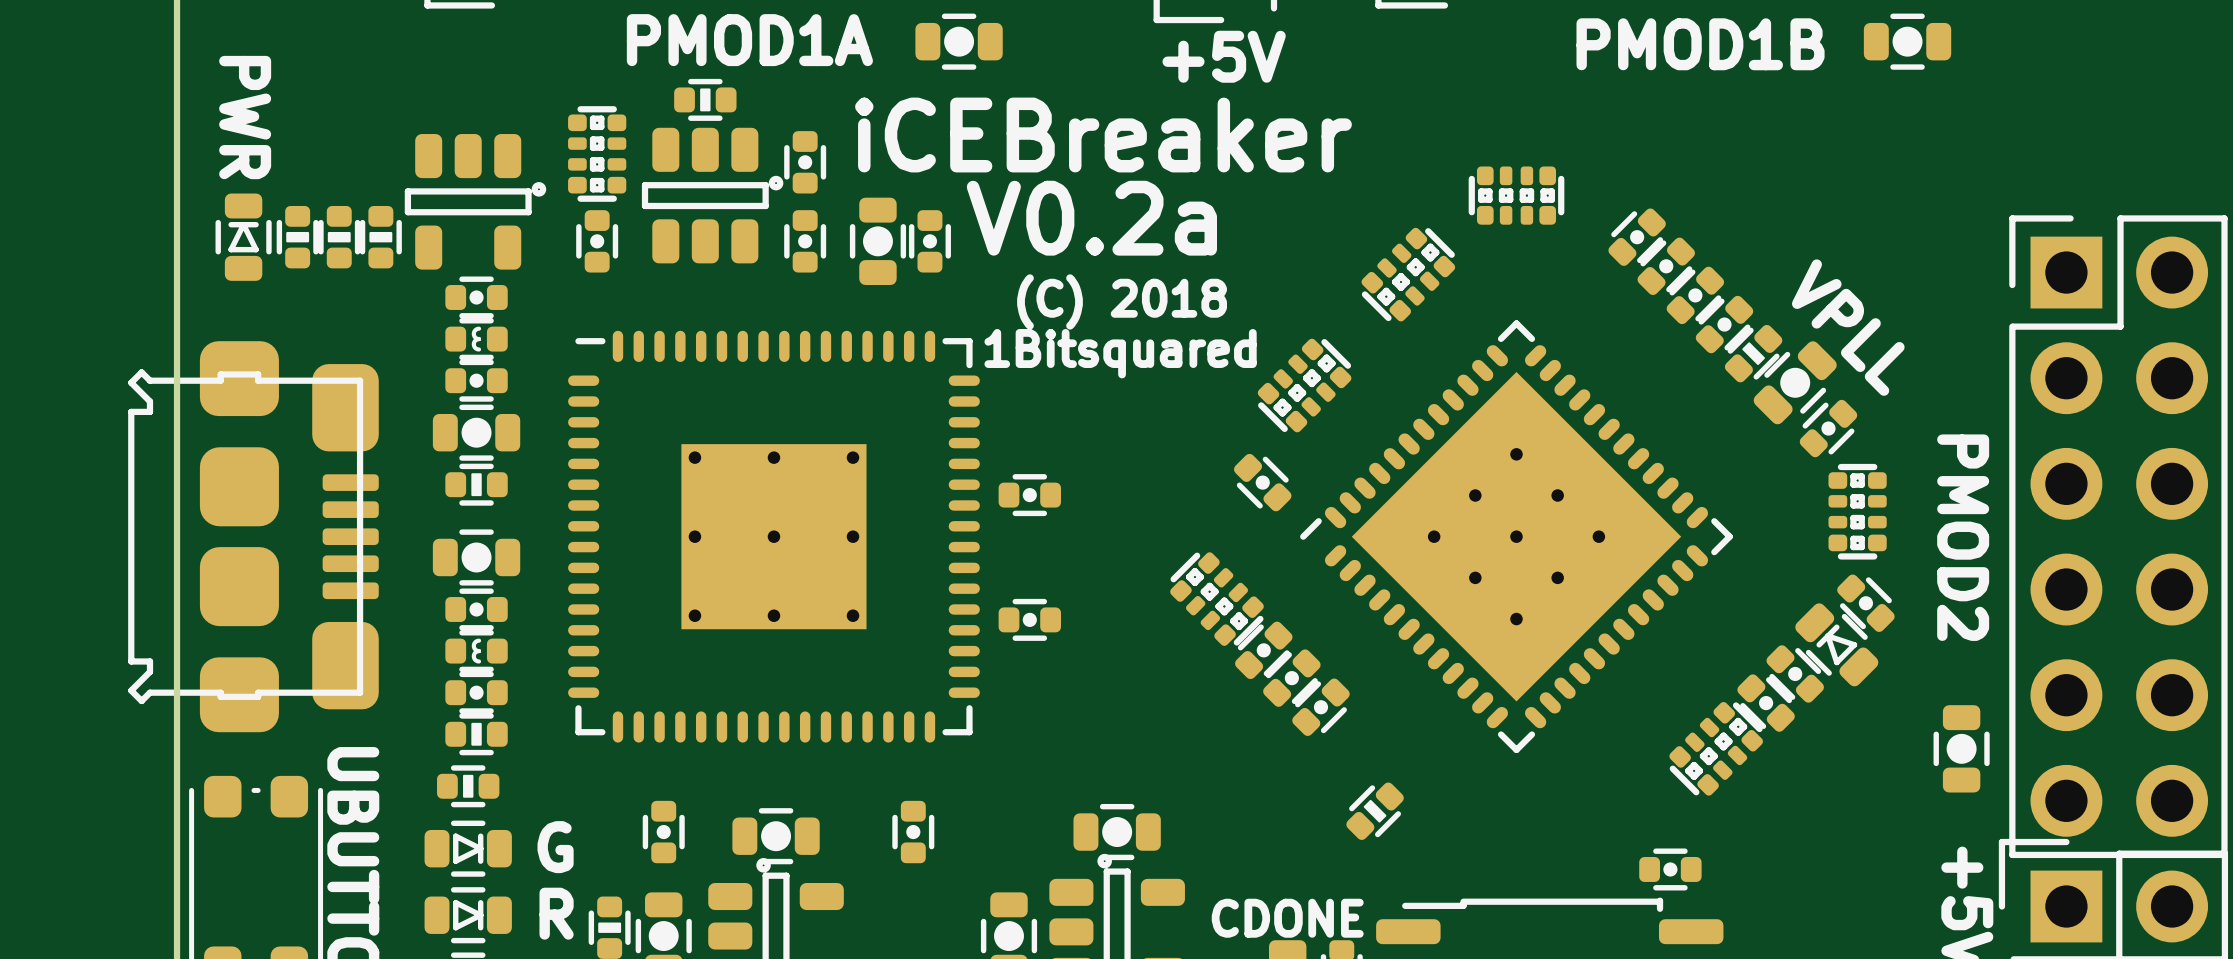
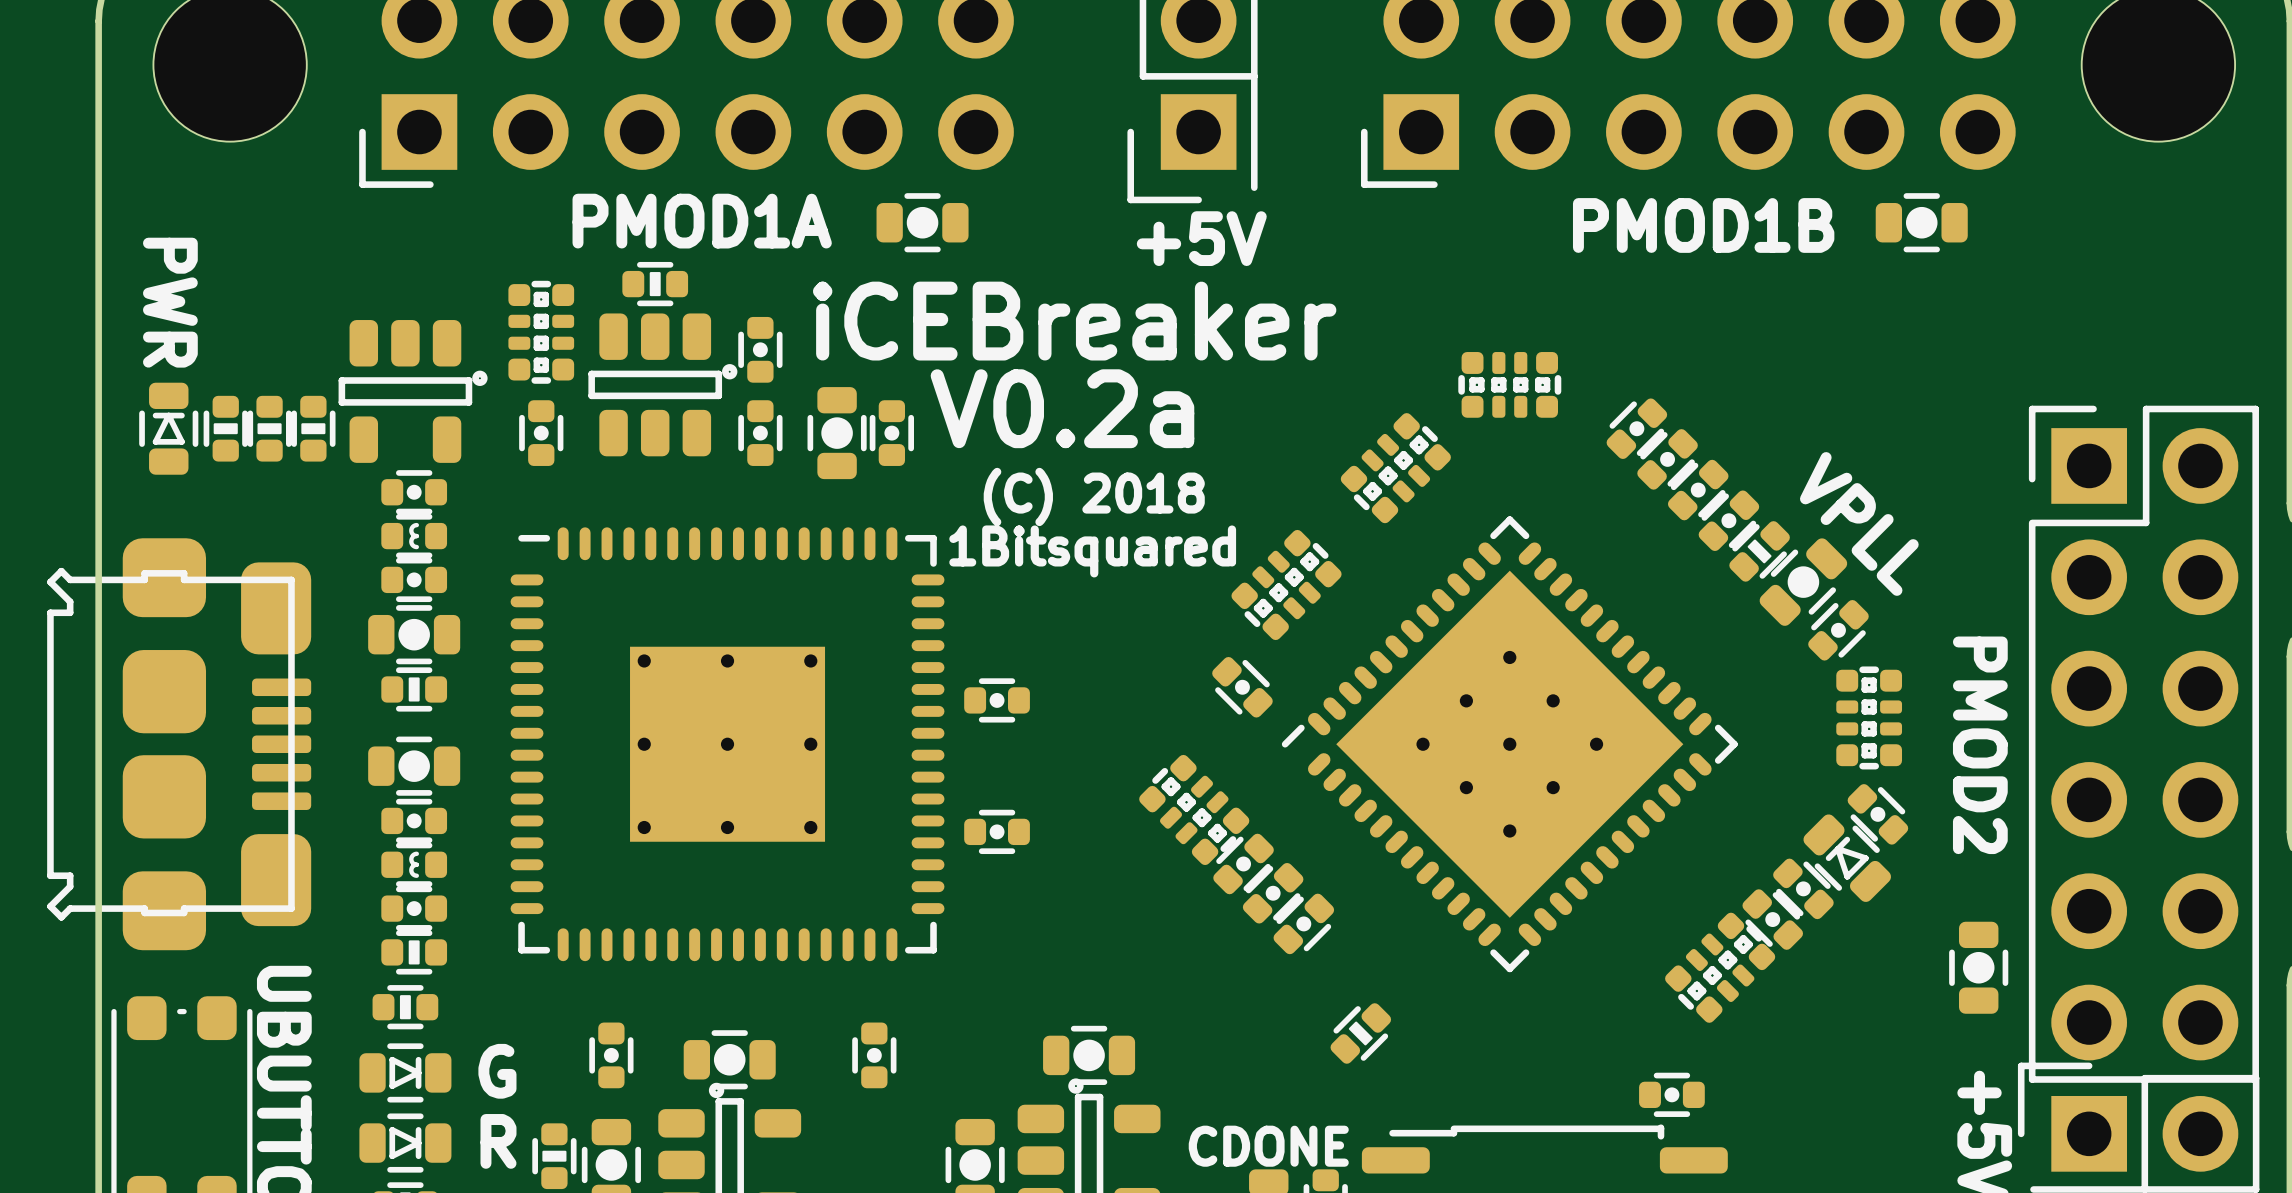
part footprint: [568, 106, 627, 202] -> [508, 280, 575, 384]
part footprint: [1468, 166, 1565, 225] -> [1458, 352, 1562, 418]
part footprint: [1361, 227, 1456, 322] -> [1340, 413, 1451, 524]
part footprint: [1257, 338, 1352, 433] -> [1231, 529, 1342, 641]
part footprint: [1828, 463, 1887, 560] -> [1836, 666, 1903, 770]
part footprint: [1170, 552, 1264, 646] -> [1139, 754, 1250, 866]
part footprint: [1669, 702, 1763, 796] -> [1665, 912, 1776, 1023]

